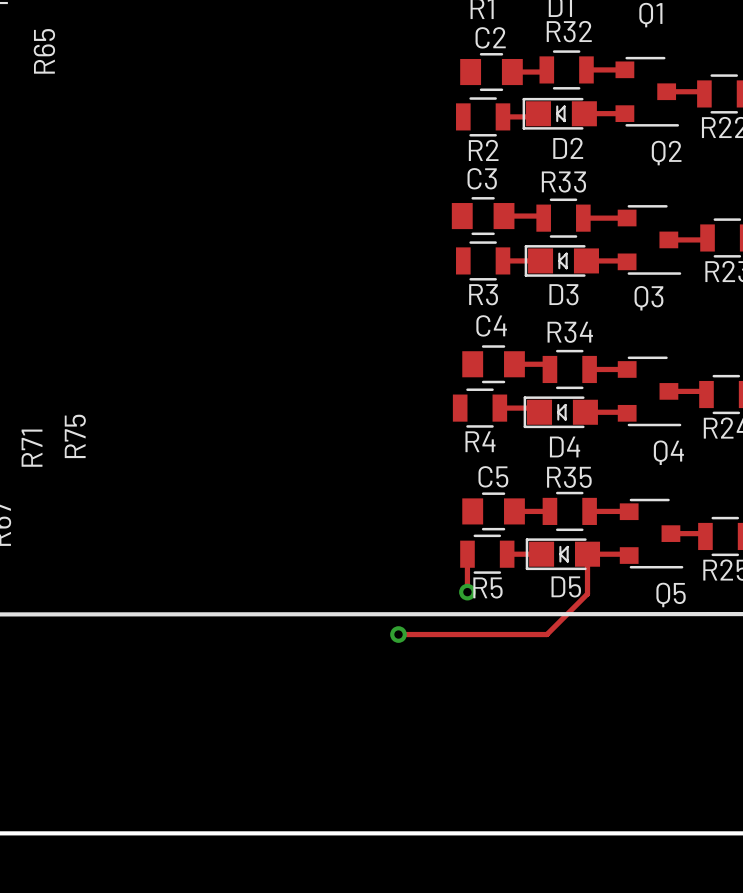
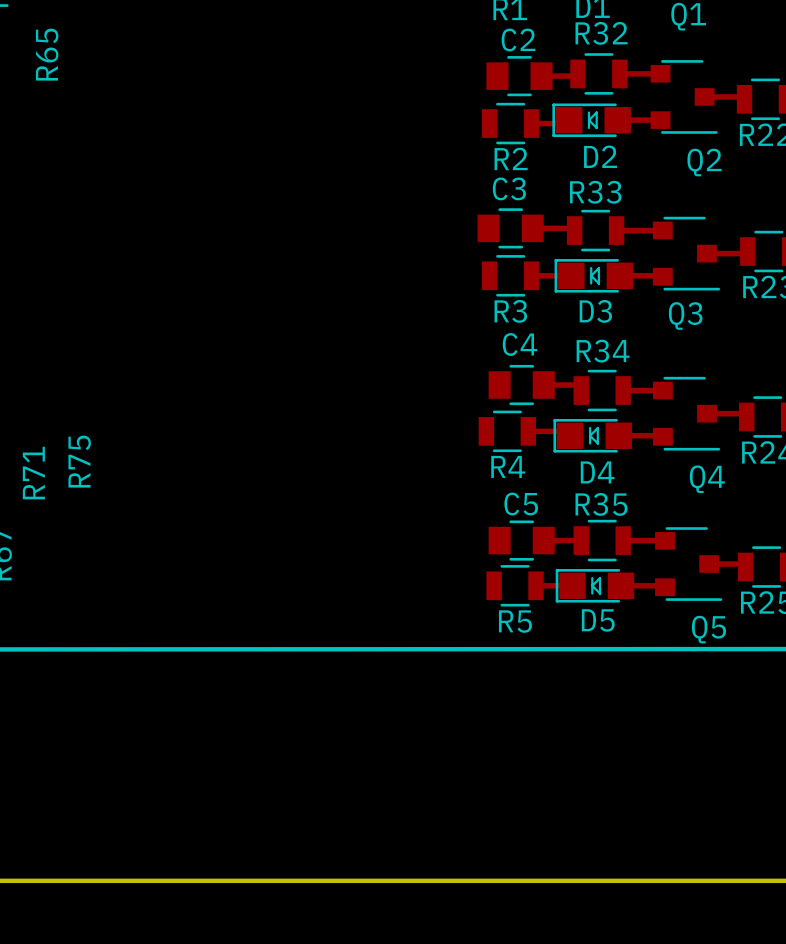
track: (467, 554) (467, 592) -> none
track: (587, 554) (587, 593) (546, 634) (398, 634) -> none
via: (467, 592) -> none
via: (398, 634) -> none

